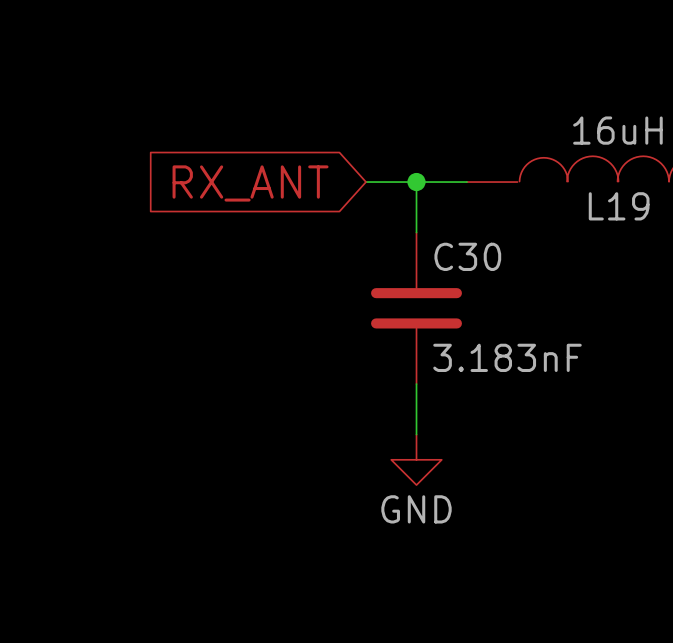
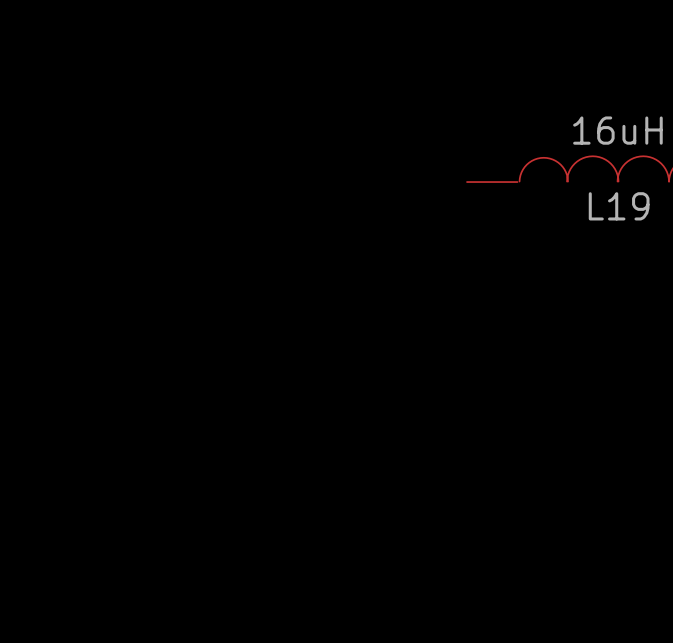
wire: (366, 182) (467, 182) -> none
wire: (416, 182) (416, 232) -> none
junction: (416, 182) -> none
global label: RX_ANT (250, 183) -> none
C30: 3.183nF (416, 308) -> none
wire: (416, 384) (416, 434) -> none
power symbol: GND (416, 459) -> none

